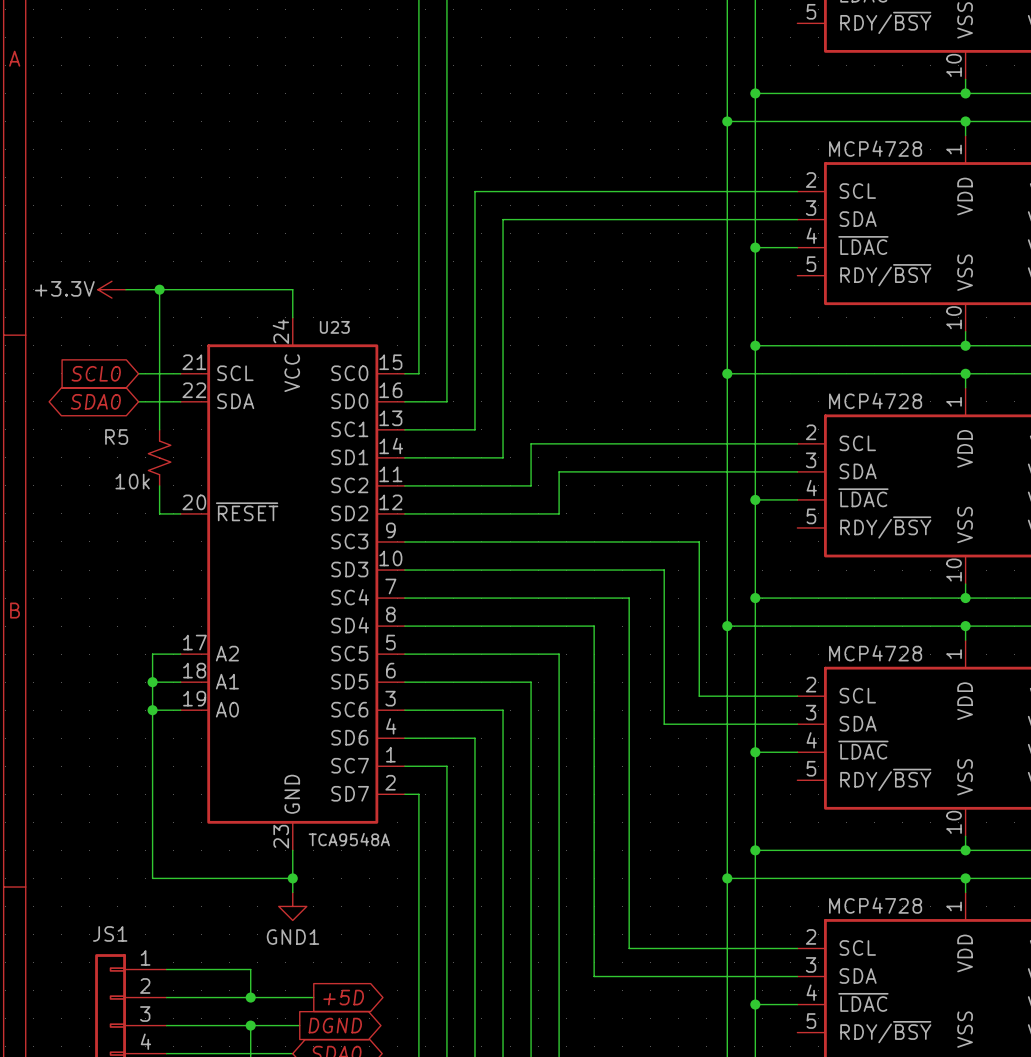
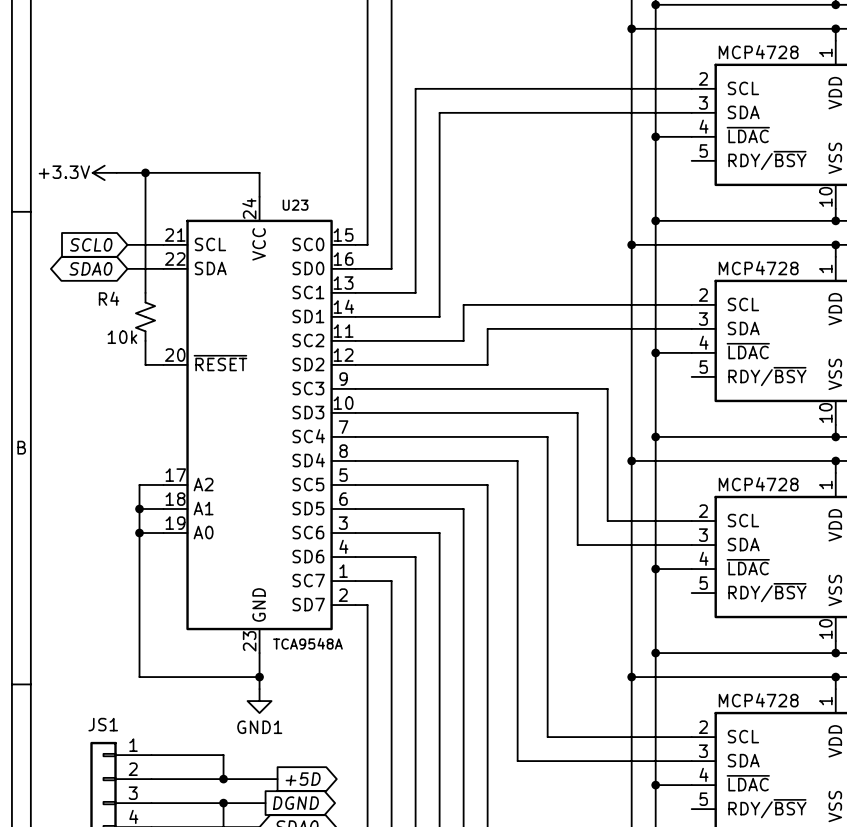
R5 name: R5 (116, 436) -> R4 (109, 298)

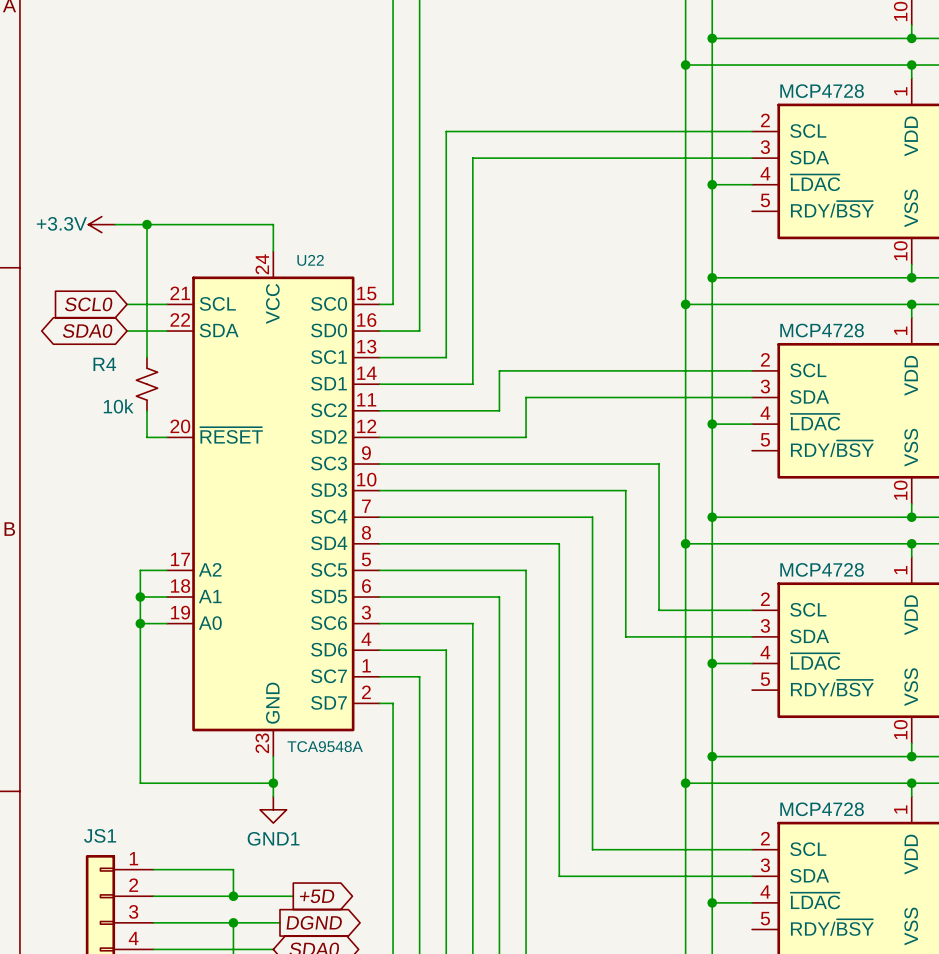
U23 name: U23 (295, 205) -> U22 (310, 260)

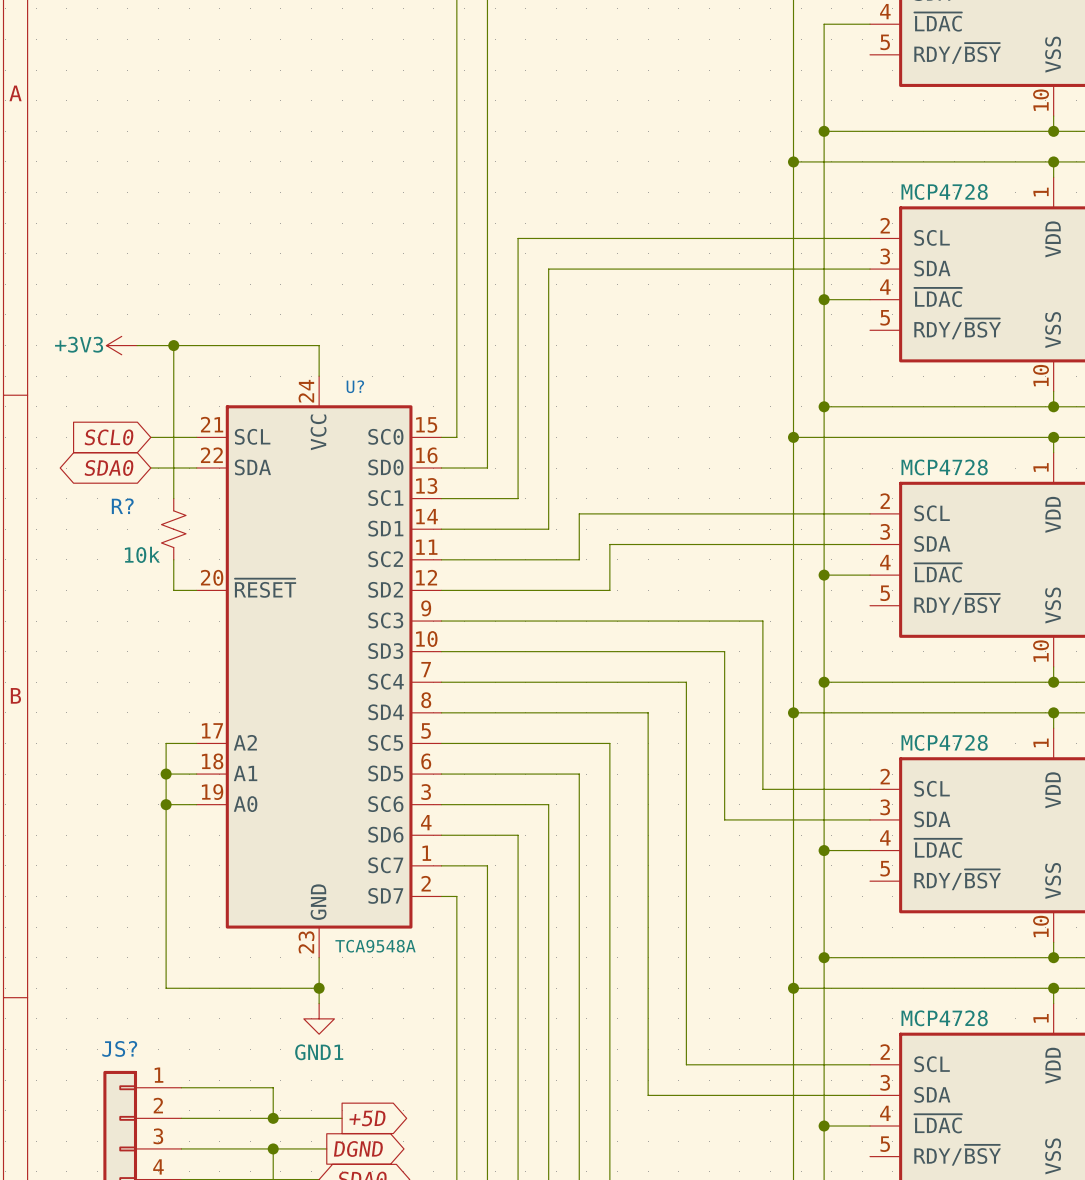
power symbol: +3.3V (101, 224) -> +3V3 (121, 345)
U22 name: U22 (310, 260) -> U? (355, 386)
R4 name: R4 (104, 364) -> R? (122, 506)
JS1 name: JS1 (100, 835) -> JS? (119, 1048)

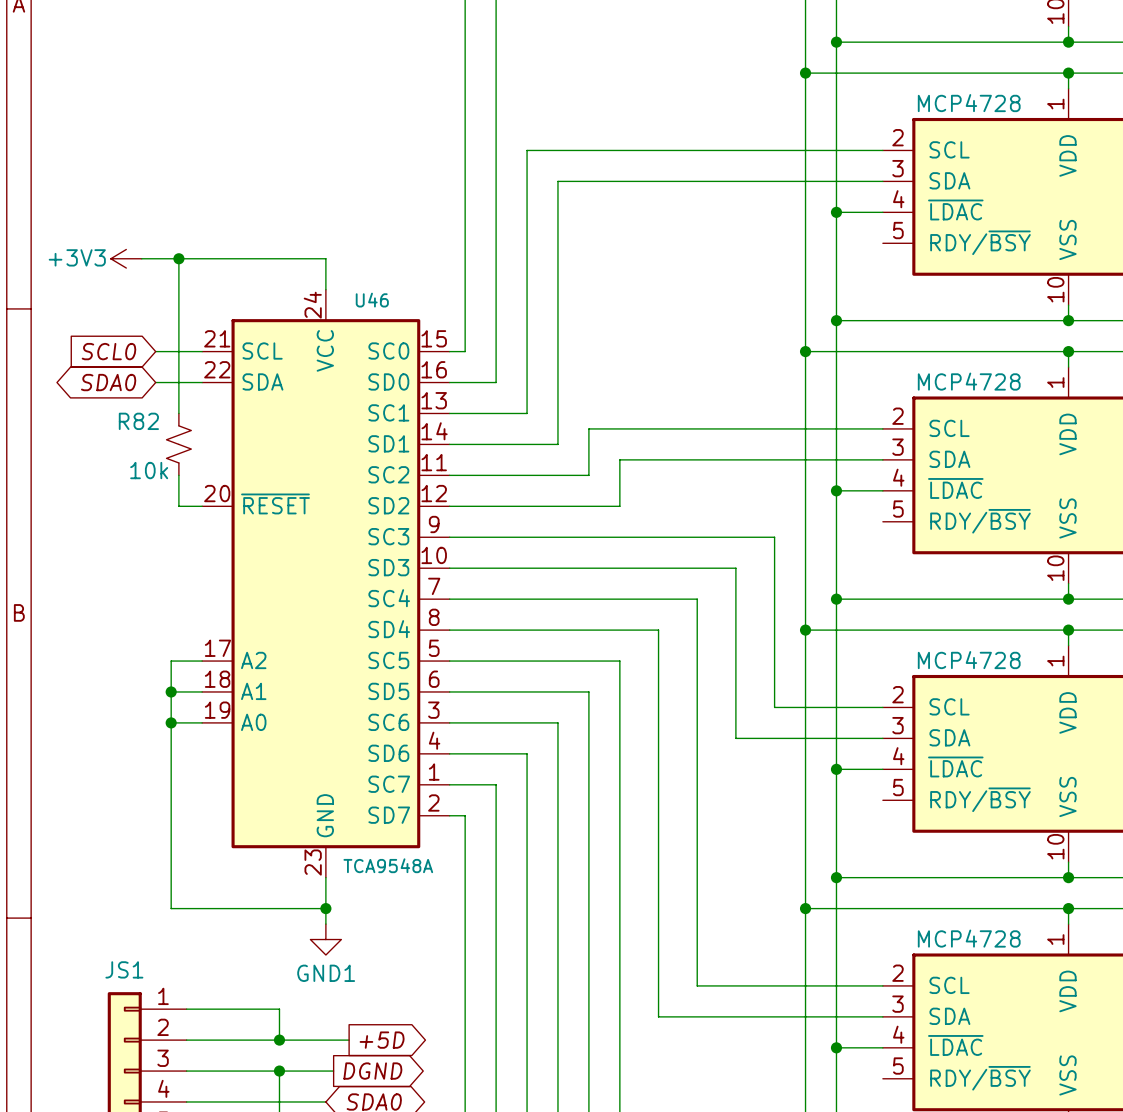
U? name: U? (355, 386) -> U46 (372, 300)
R? name: R? (122, 506) -> R82 (138, 421)
JS? name: JS? (119, 1048) -> JS1 (124, 969)

